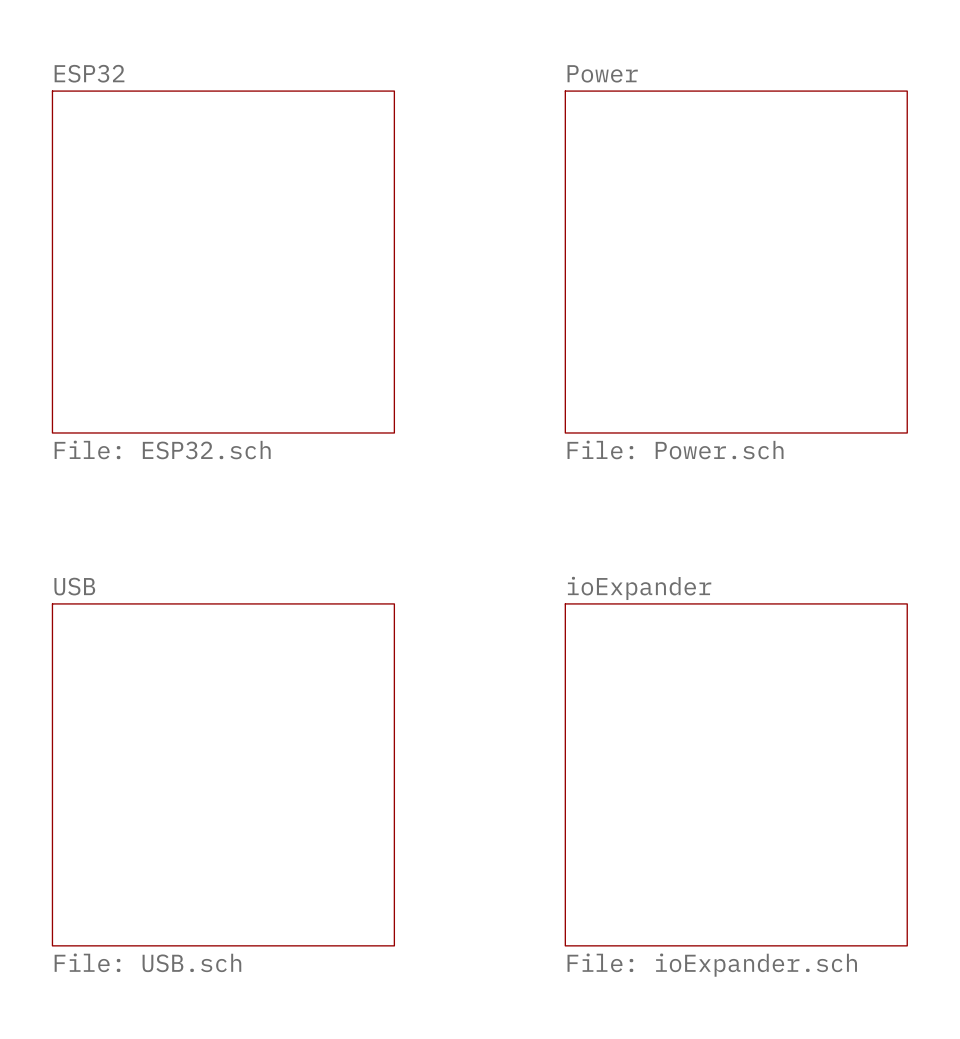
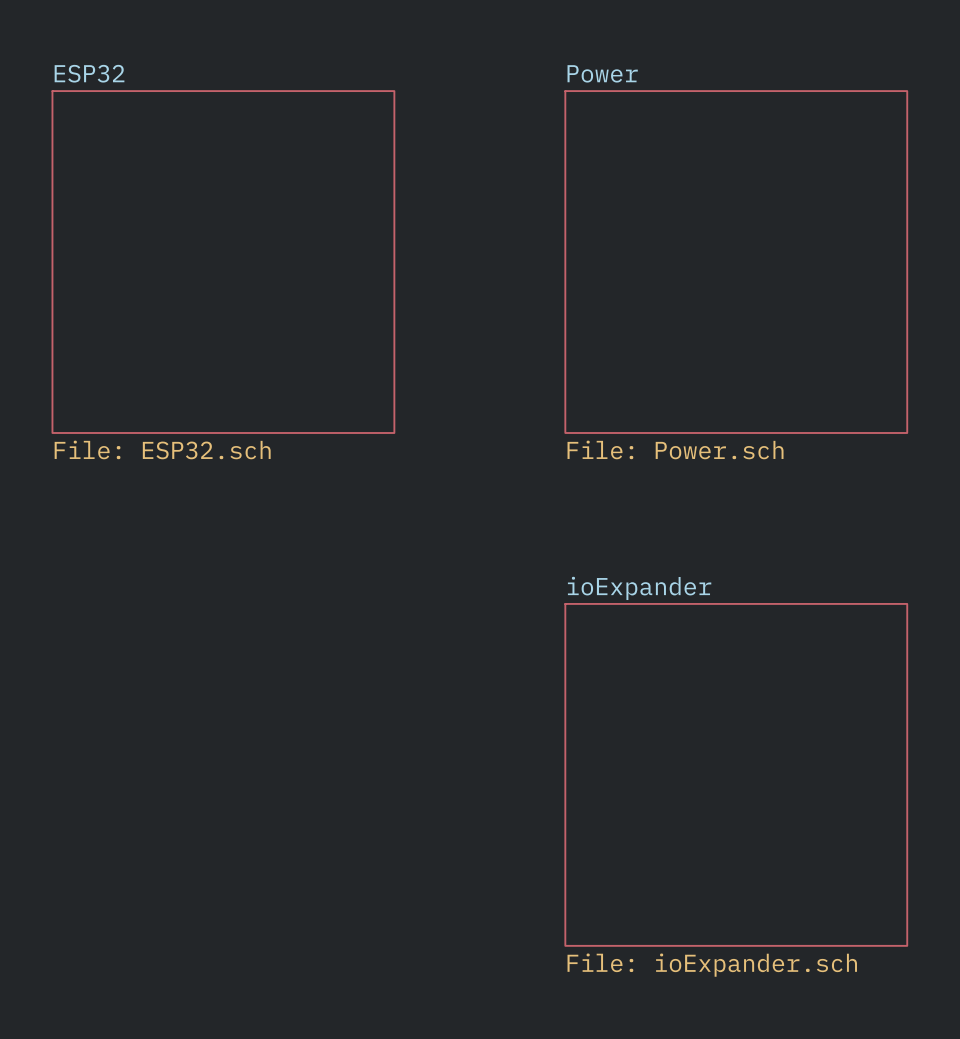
sheet USB: File: USB.sch (223, 774) -> none

